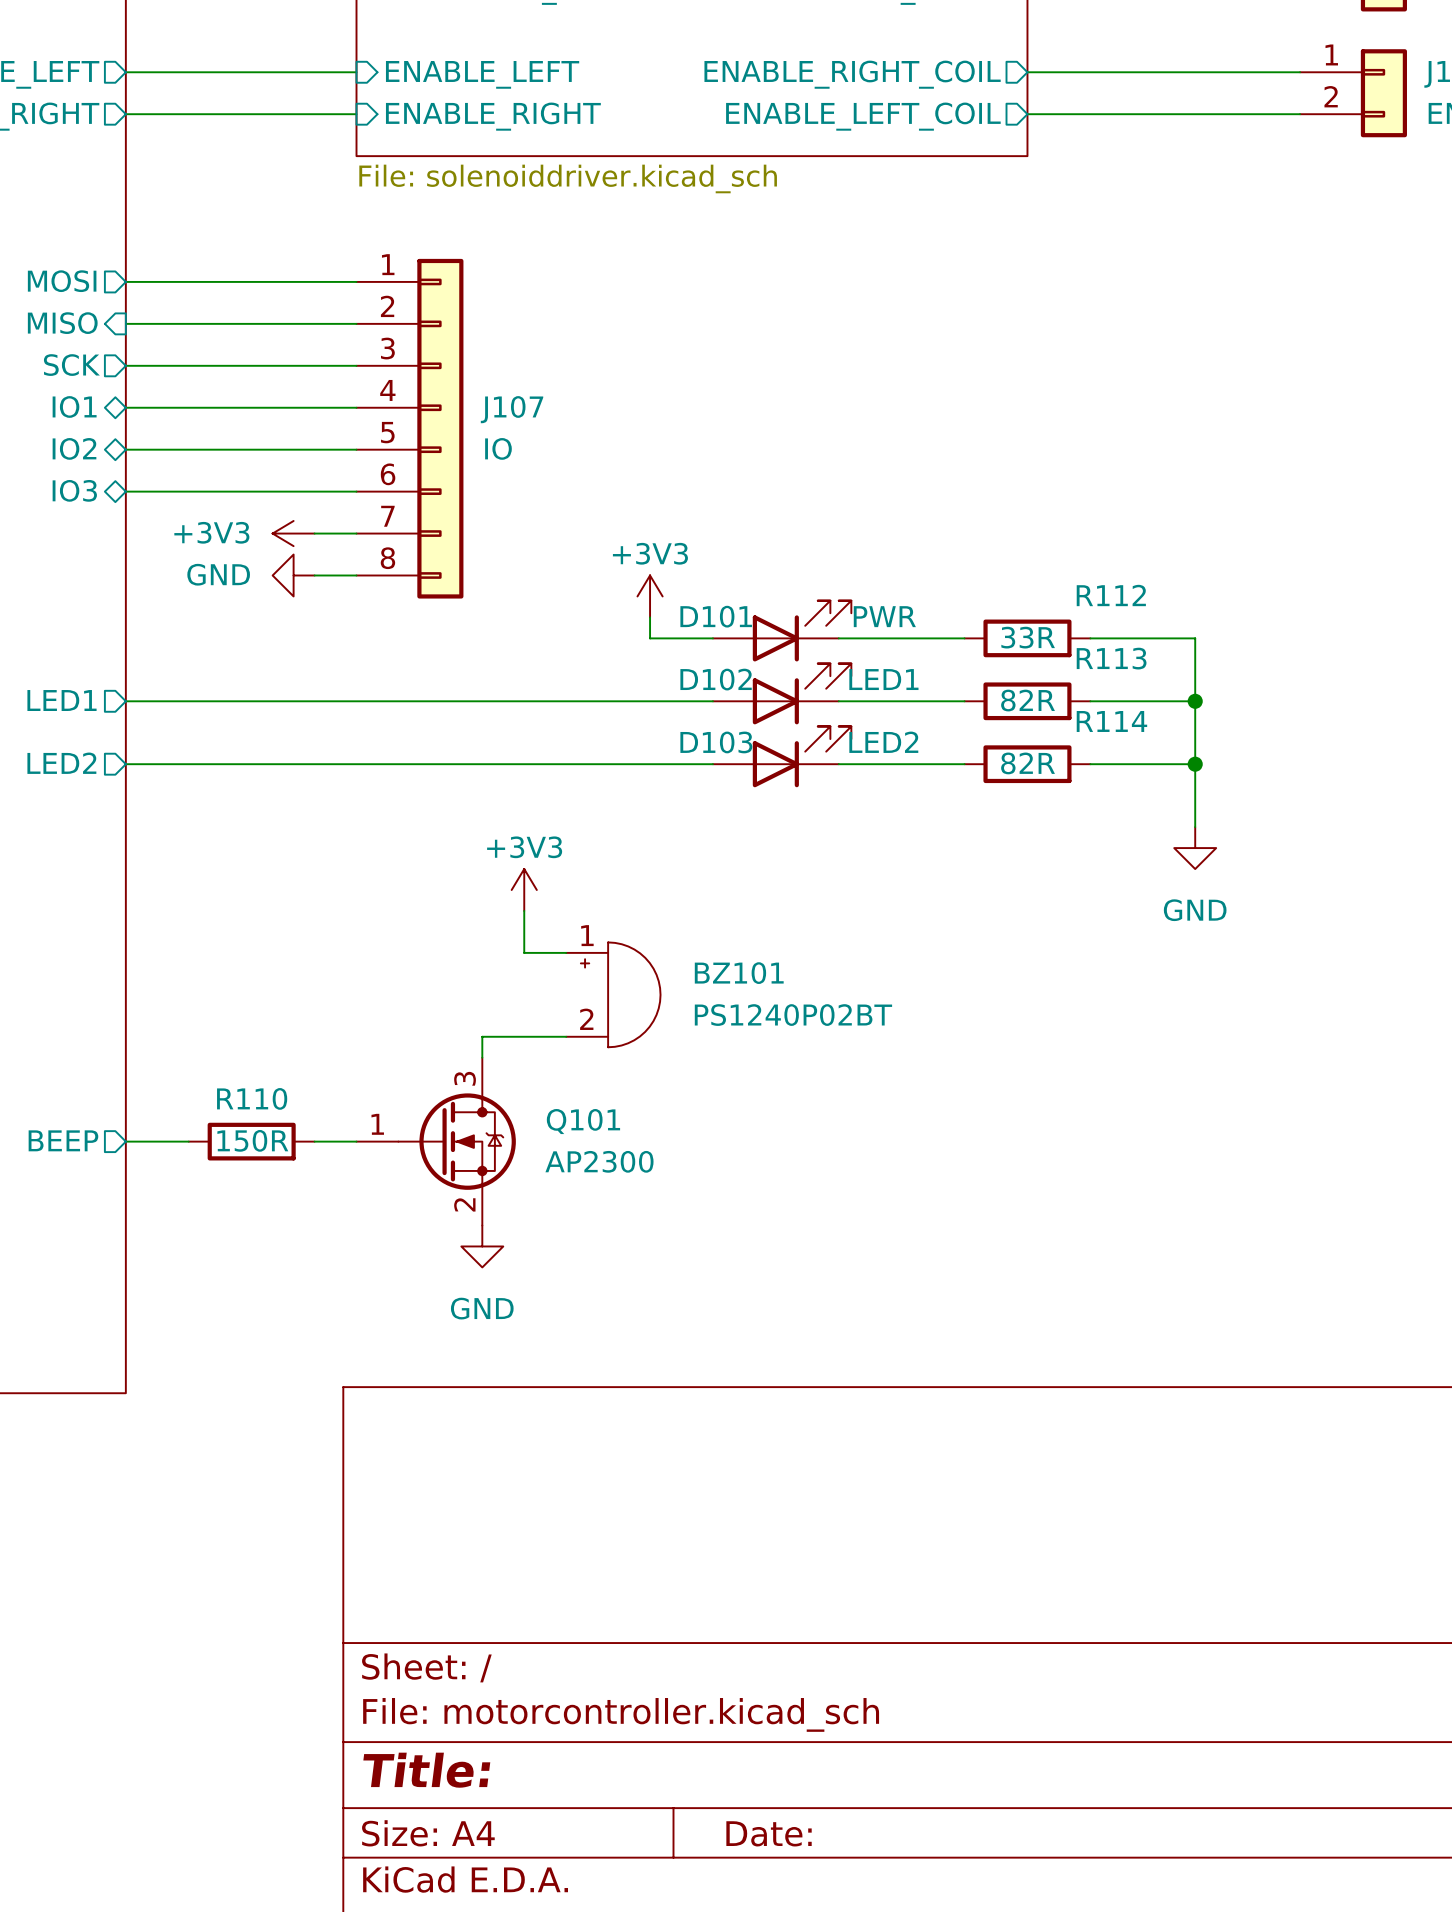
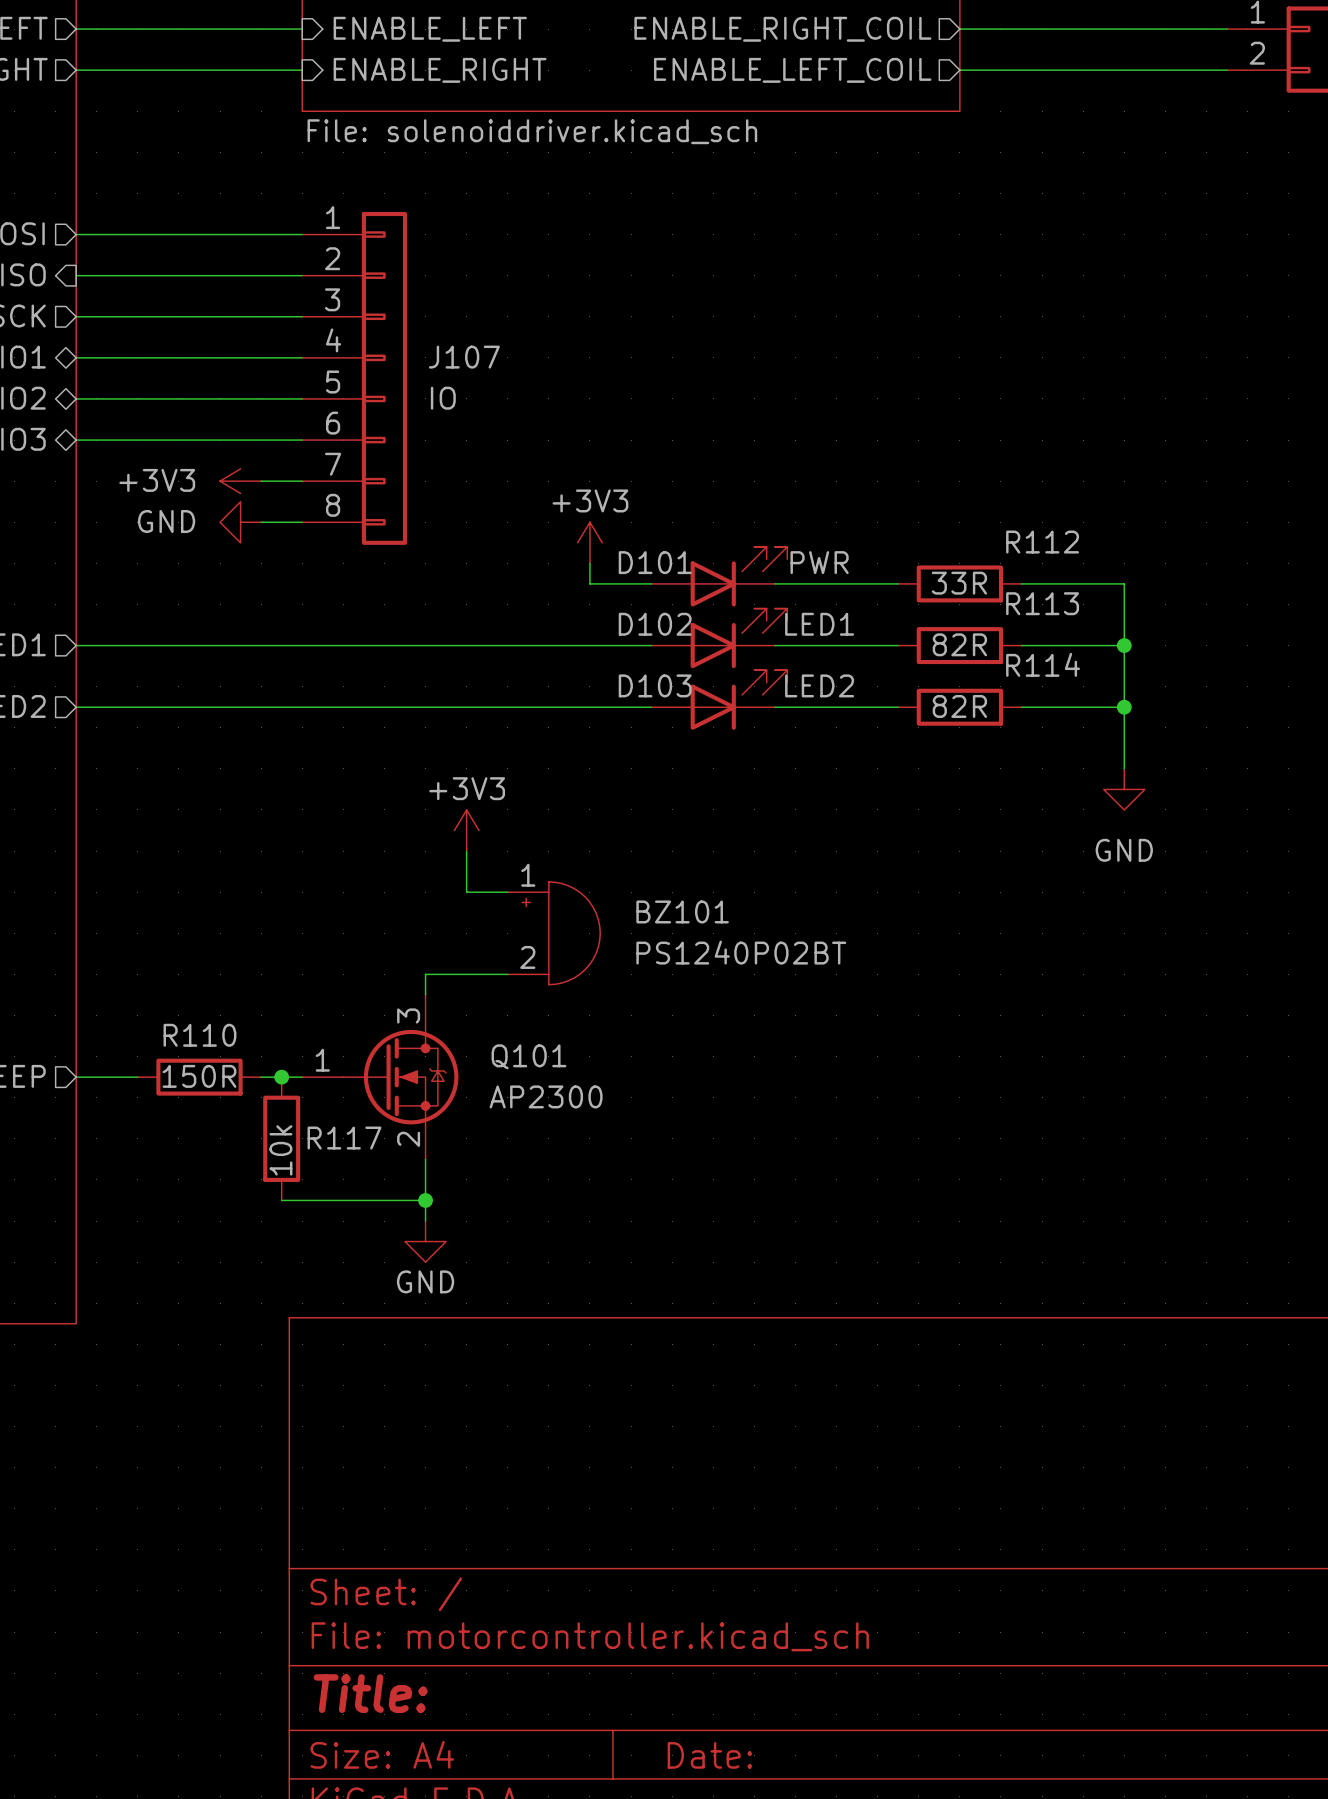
junction: none -> (281, 1077)
R117: none -> 10k (281, 1138)
wire: none -> (425, 1159) (425, 1221)
power symbol position: GND (482, 1246) -> GND (425, 1241)
wire: none -> (281, 1200) (425, 1200)
junction: none -> (425, 1200)
power symbol text position: GND (482, 1308) -> GND (425, 1281)

